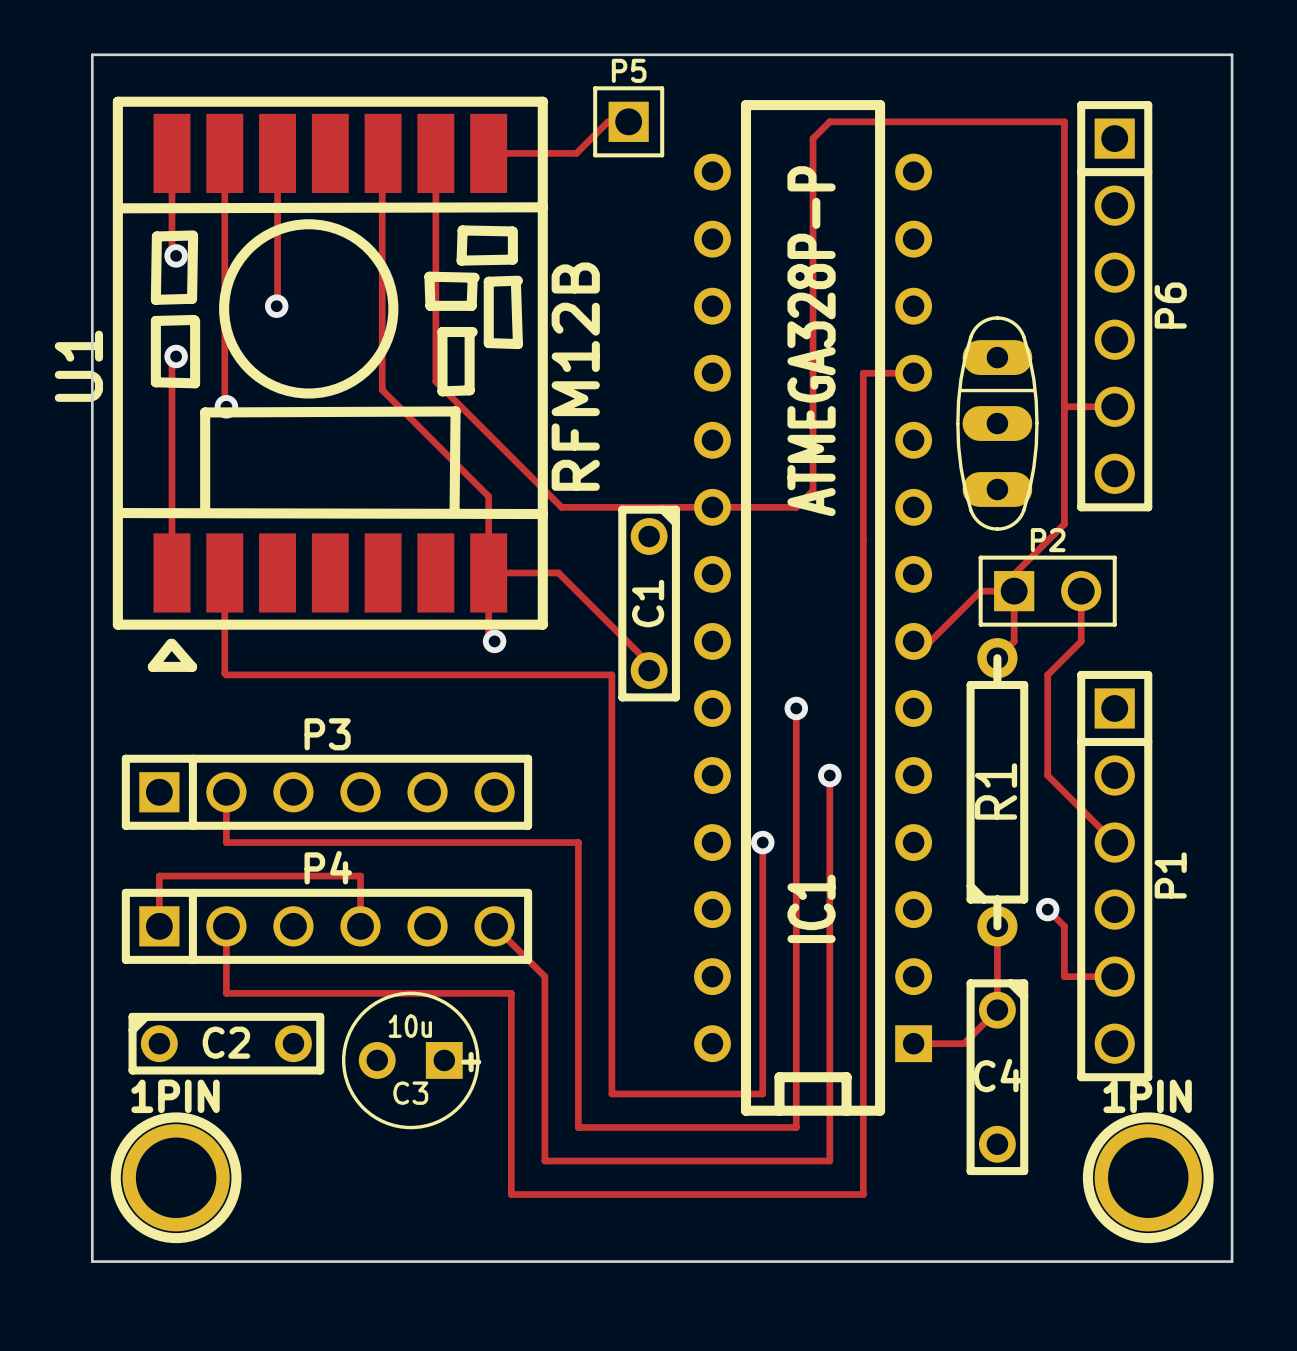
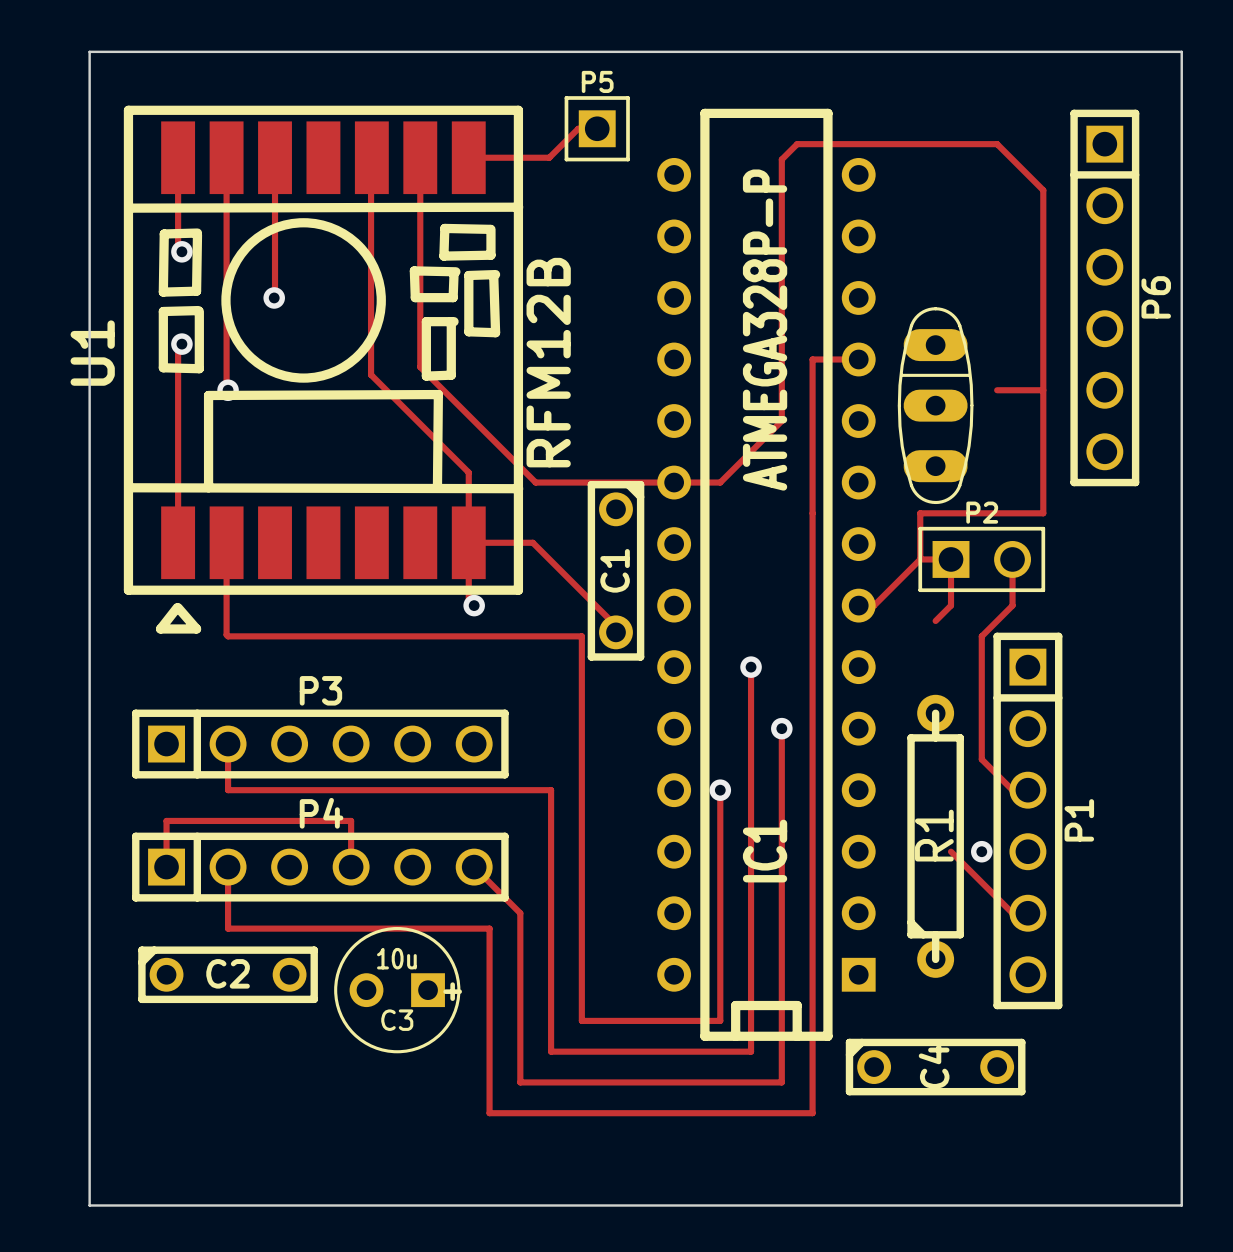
board edge: (92, 54) (92, 1261) (1232, 1261) (1232, 54) (92, 54) -> (89, 51) (89, 1205) (1181, 1205) (1181, 51) (89, 51)
P6 position: (1114, 306) -> (1104, 297)
track: (762, 507) (796, 507) (813, 490) (813, 138) (829, 121) (1064, 121) (1064, 524) (1014, 574) (1014, 591) -> (720, 482) (781, 421) (781, 159) (797, 144) (997, 144) (1043, 190) (1043, 513) (920, 513) (920, 559)
track: (1047, 775) (1114, 842) -> (981, 728) (981, 759) (1012, 790) (1027, 790)
R1 position: (997, 792) -> (935, 836)
P1 position: (1114, 876) -> (1027, 820)
track: (1047, 909) (1064, 926) (1064, 976) (1081, 976) -> (951, 851) (1012, 913)
track: (997, 926) (997, 1010) (963, 1043) (913, 1043) -> none
C4 rotation: 0° (997, 1077) -> 90° counterclockwise (935, 1067)
1PIN: (176, 1177) -> none
1PIN: (1148, 1177) -> none

